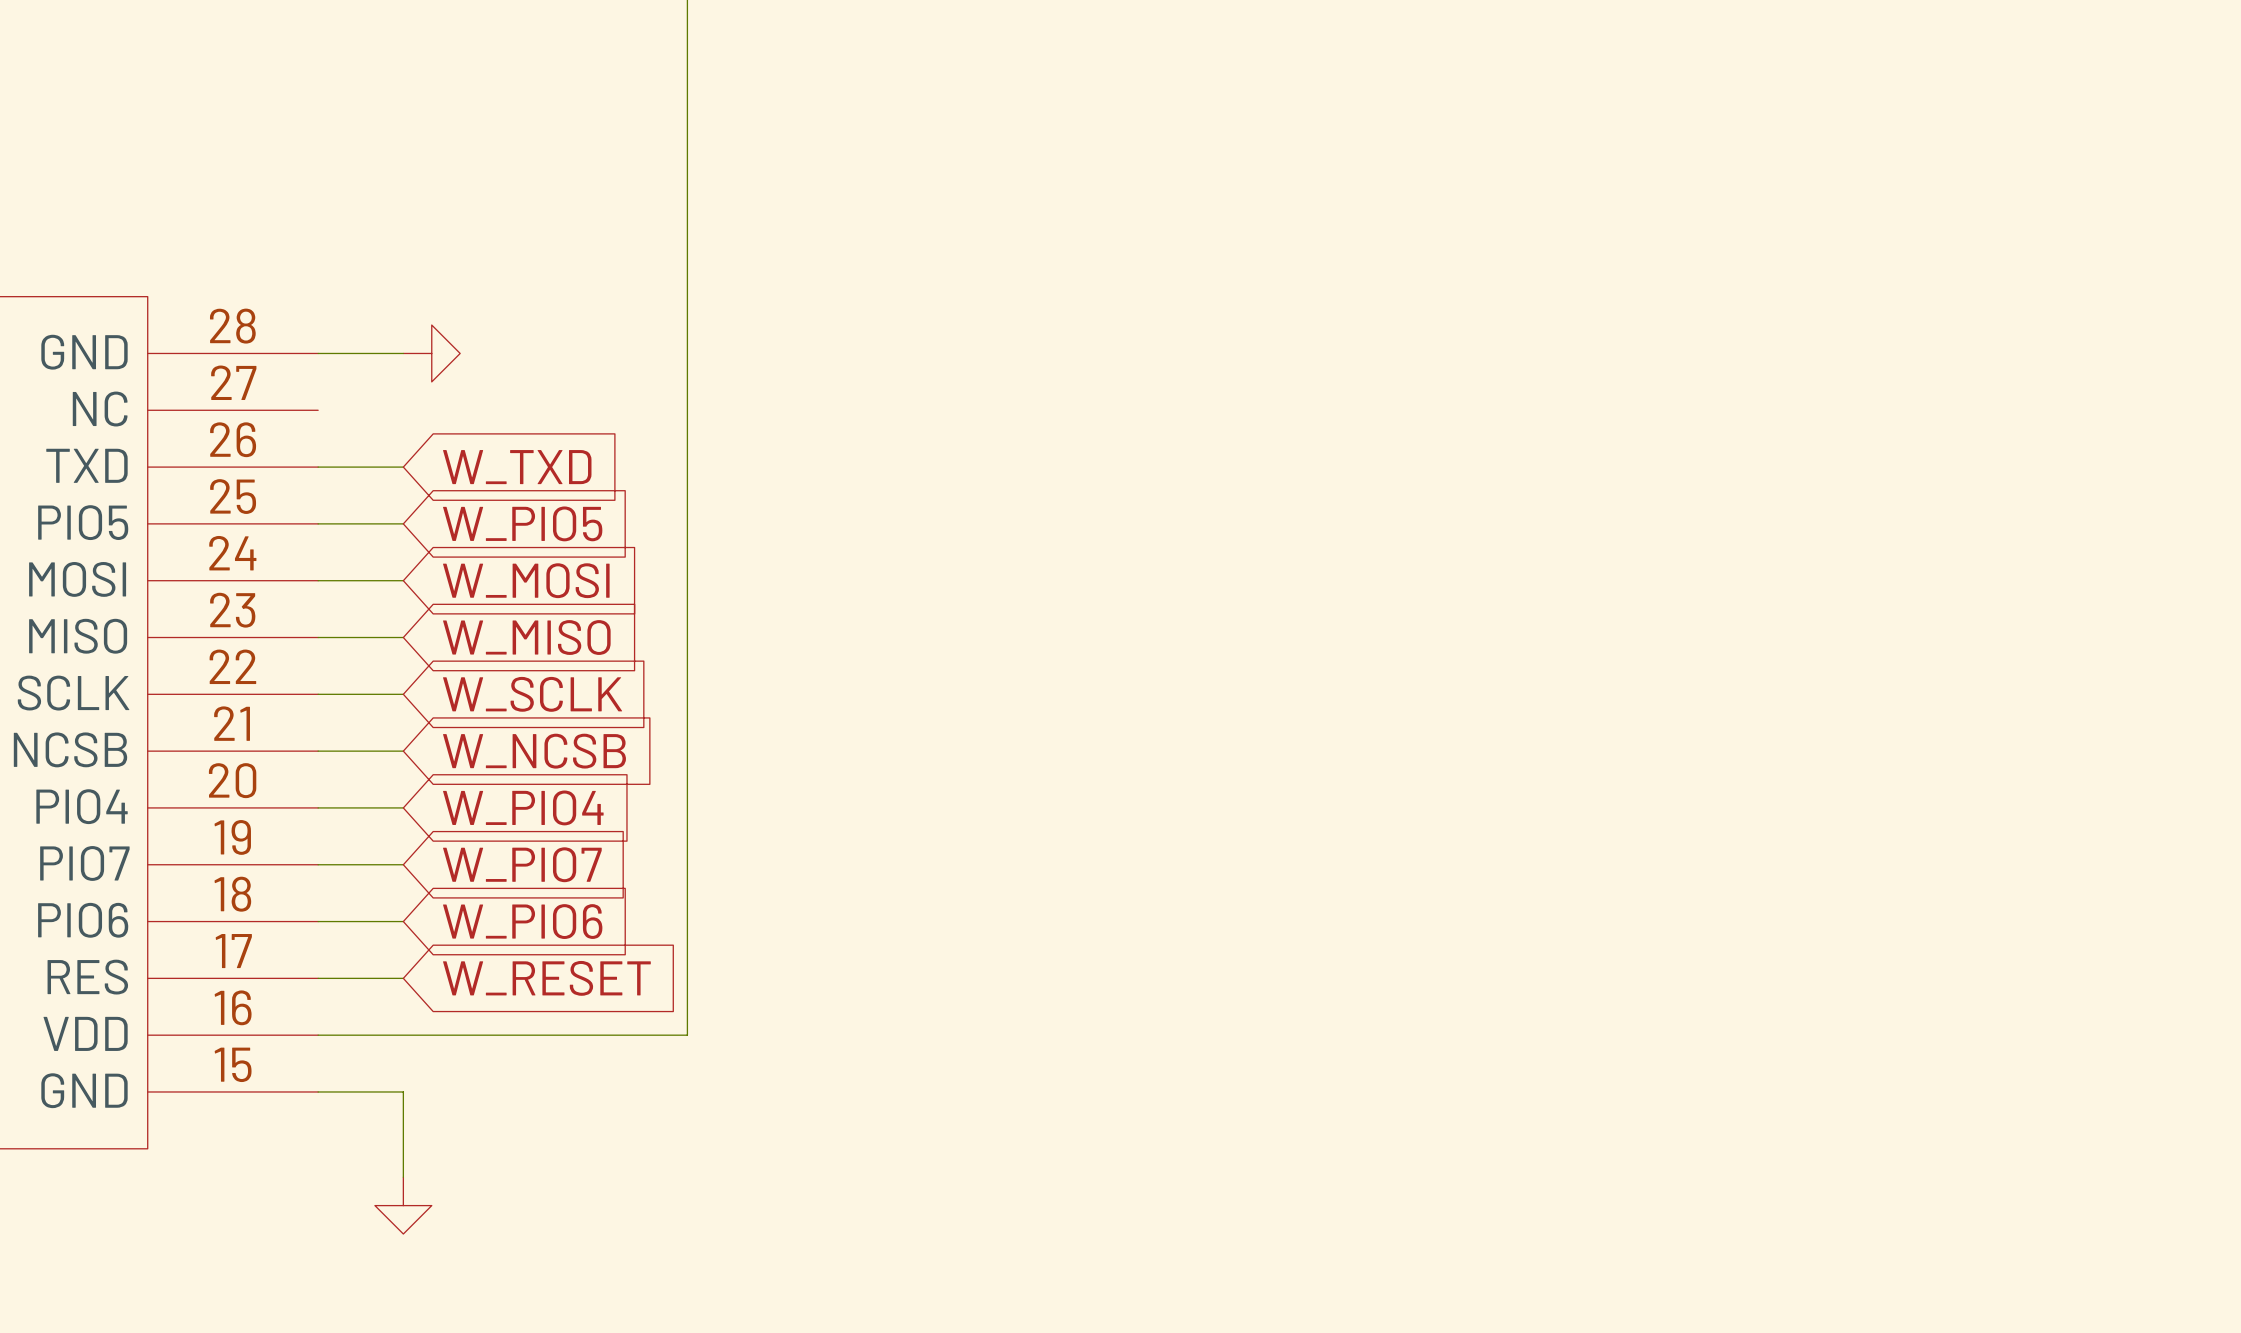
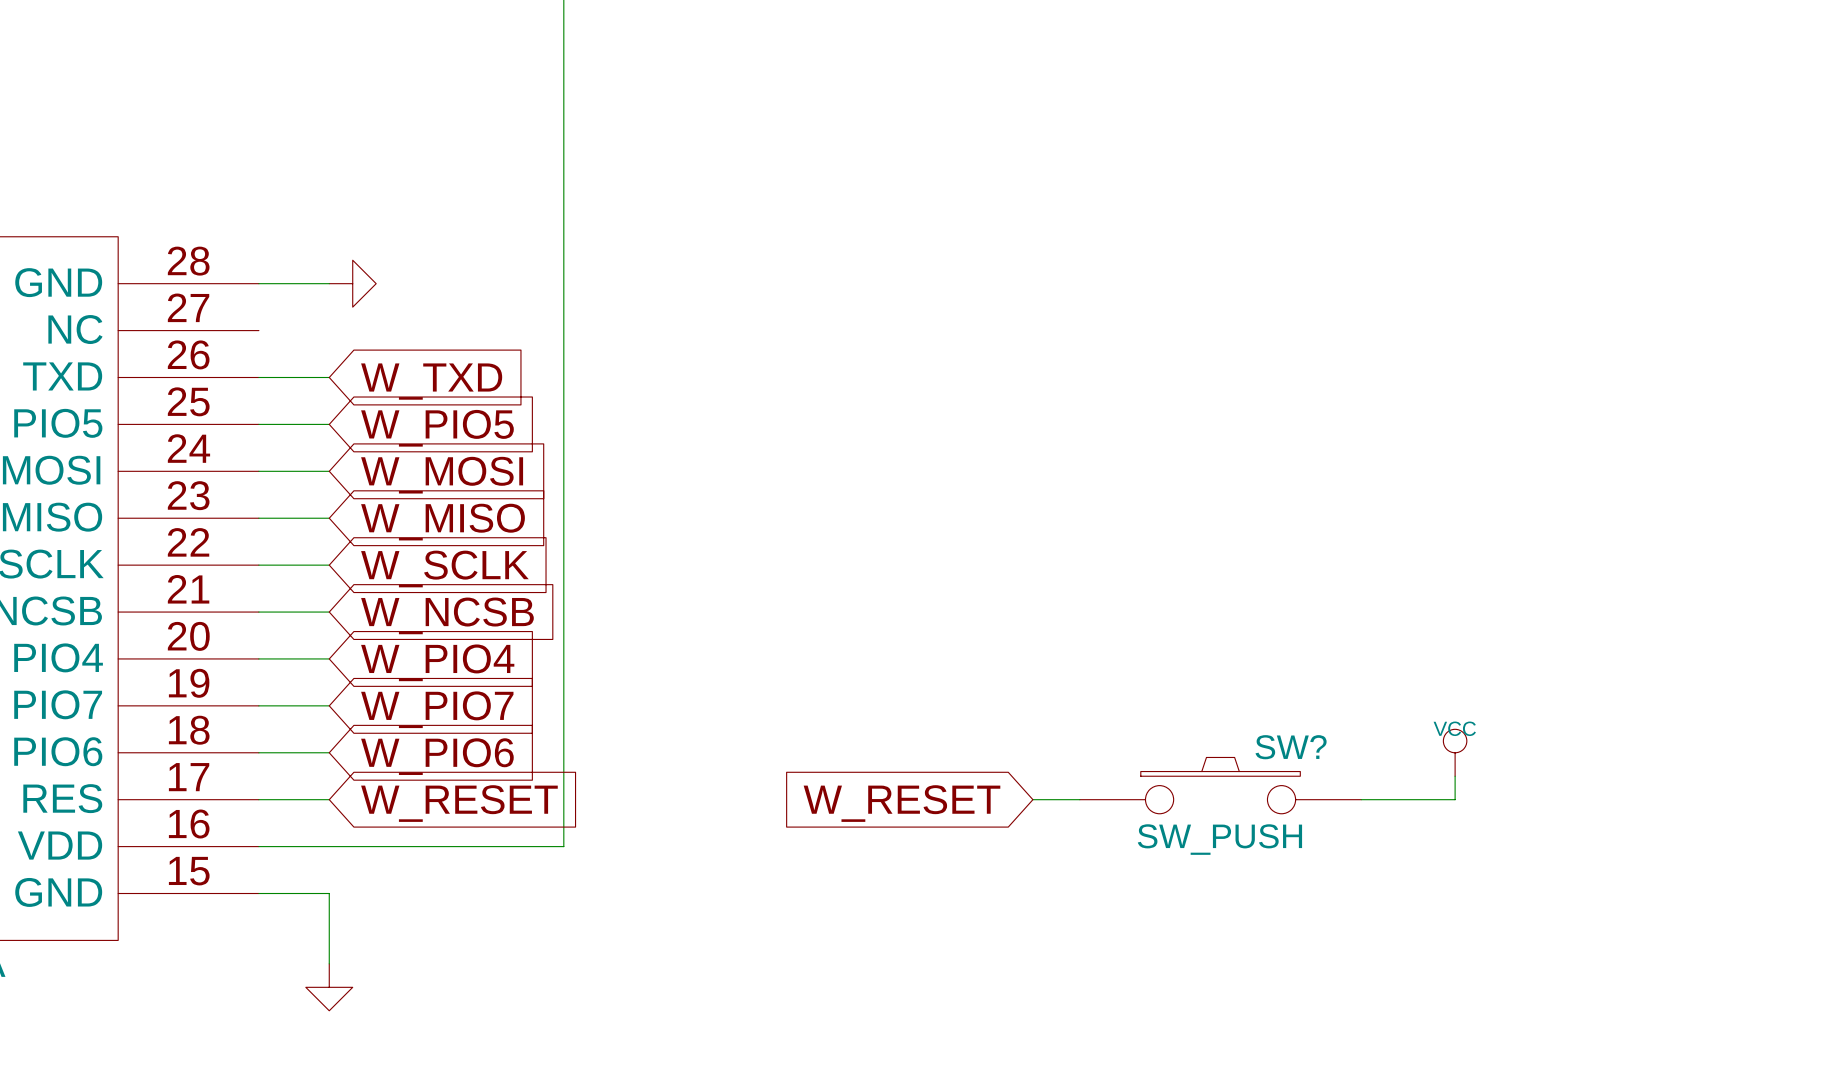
power symbol: none -> VCC (1455, 752)
wire: none -> (1455, 776) (1455, 799) (1361, 799)
SW?: none -> SW_PUSH (1220, 785)
global label: none -> W_RESET (901, 803)
wire: none -> (1032, 799) (1079, 799)

